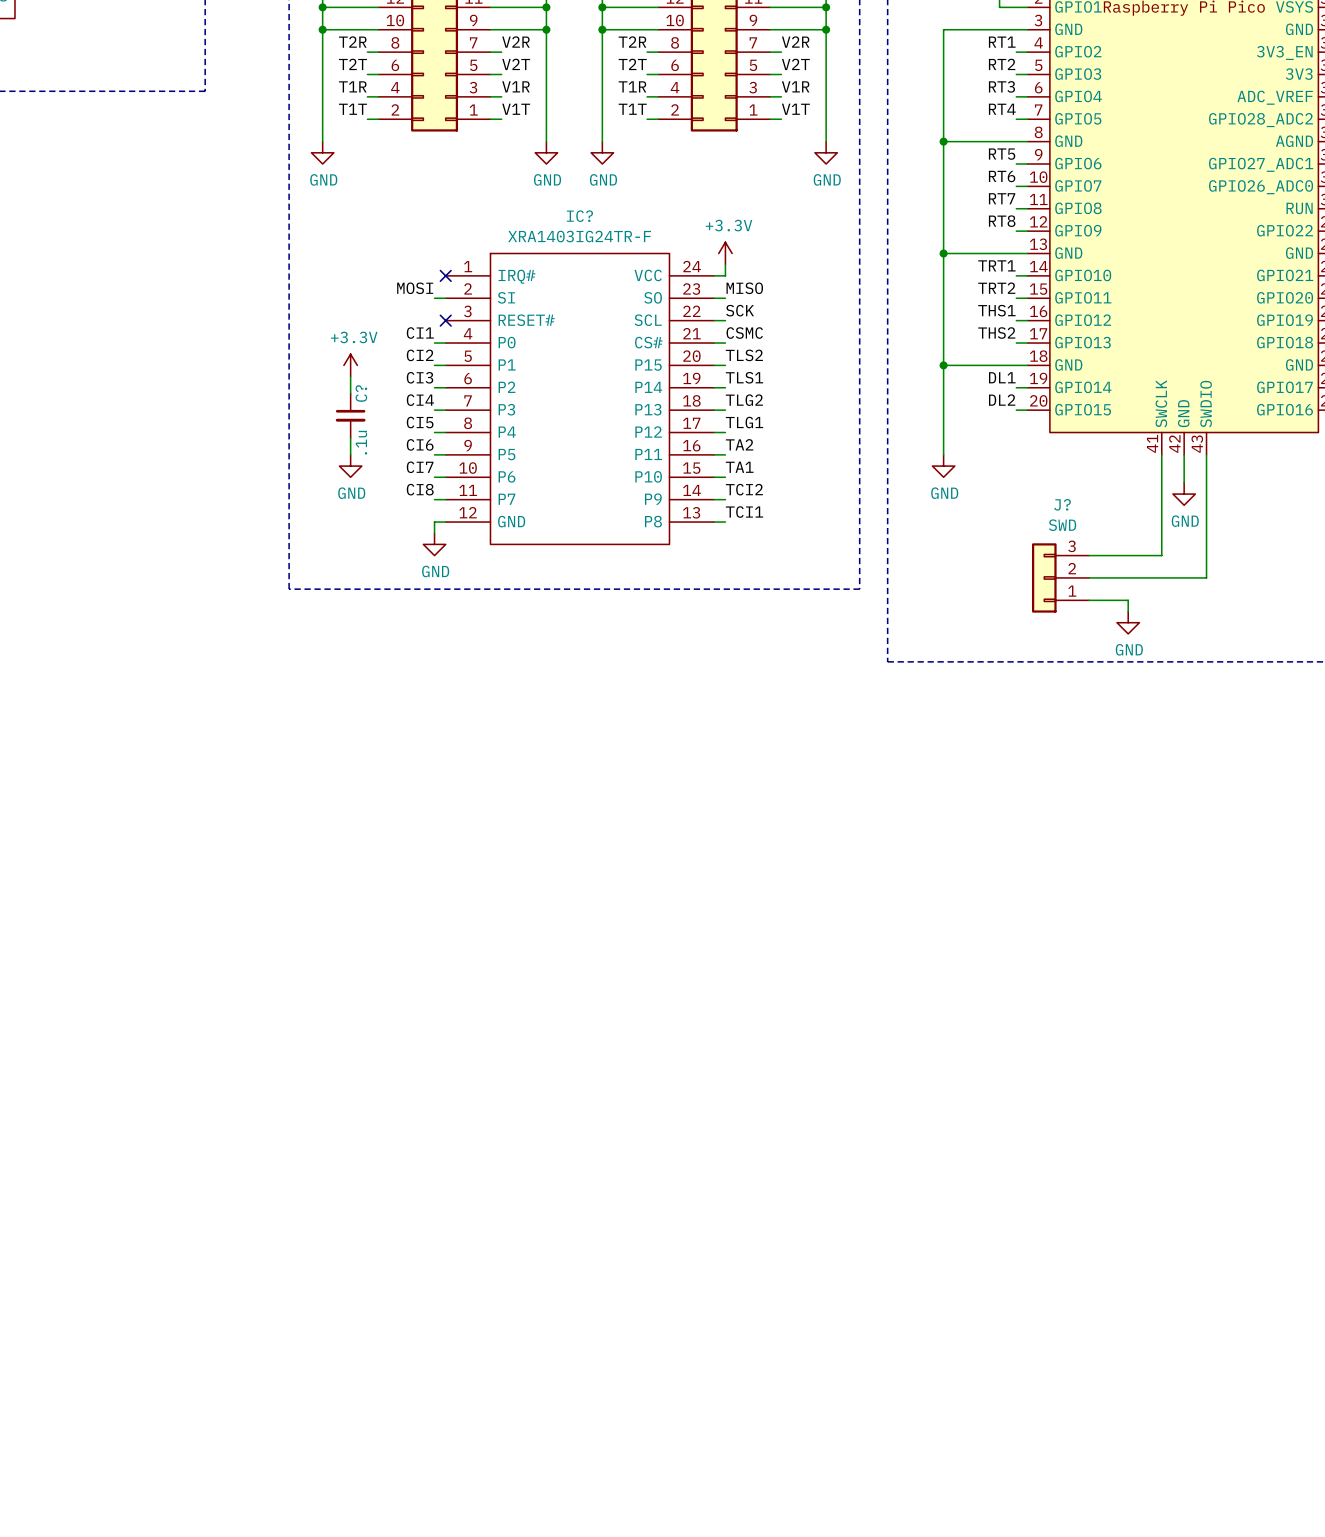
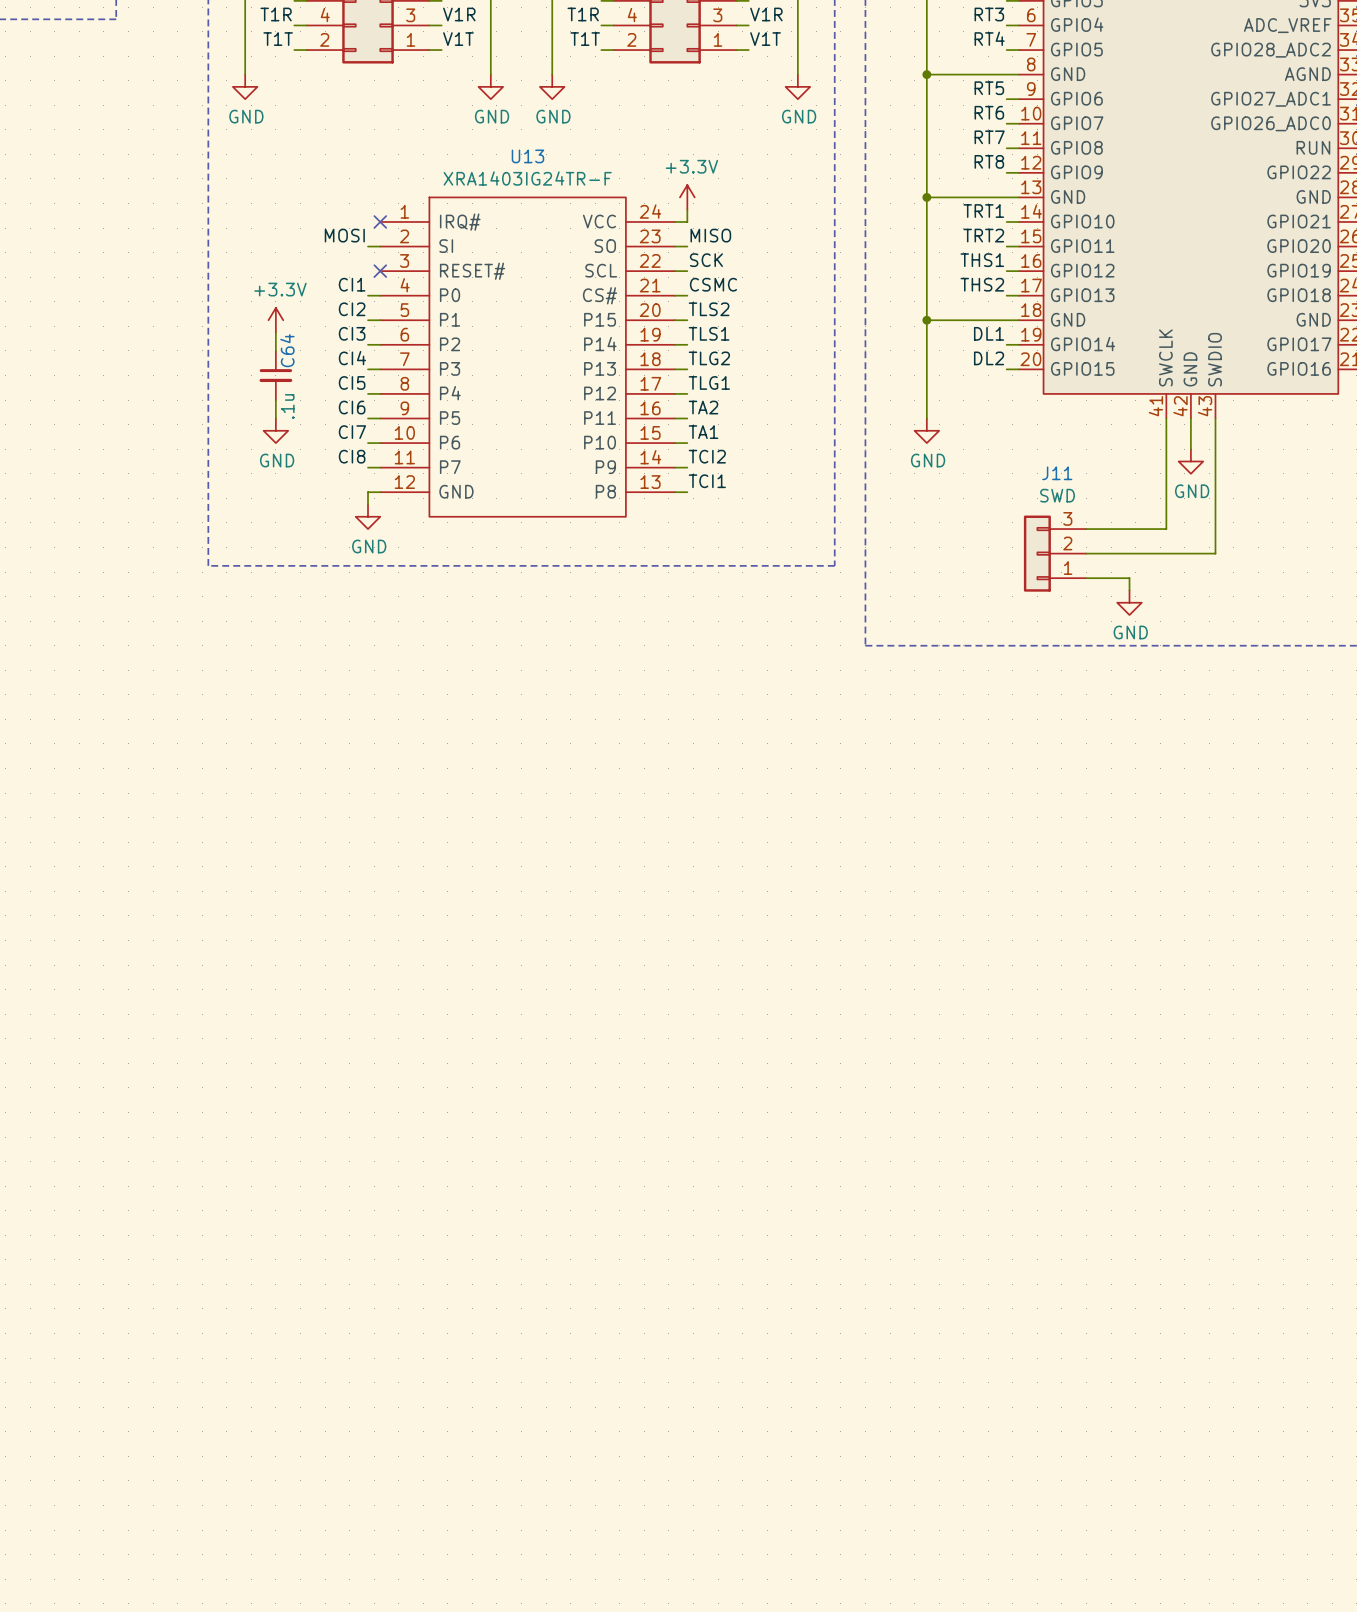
IC? name: IC? (579, 216) -> U13 (527, 156)
C? name: C? (361, 393) -> C64 (287, 350)
J? name: J? (1062, 504) -> J11 (1057, 473)

